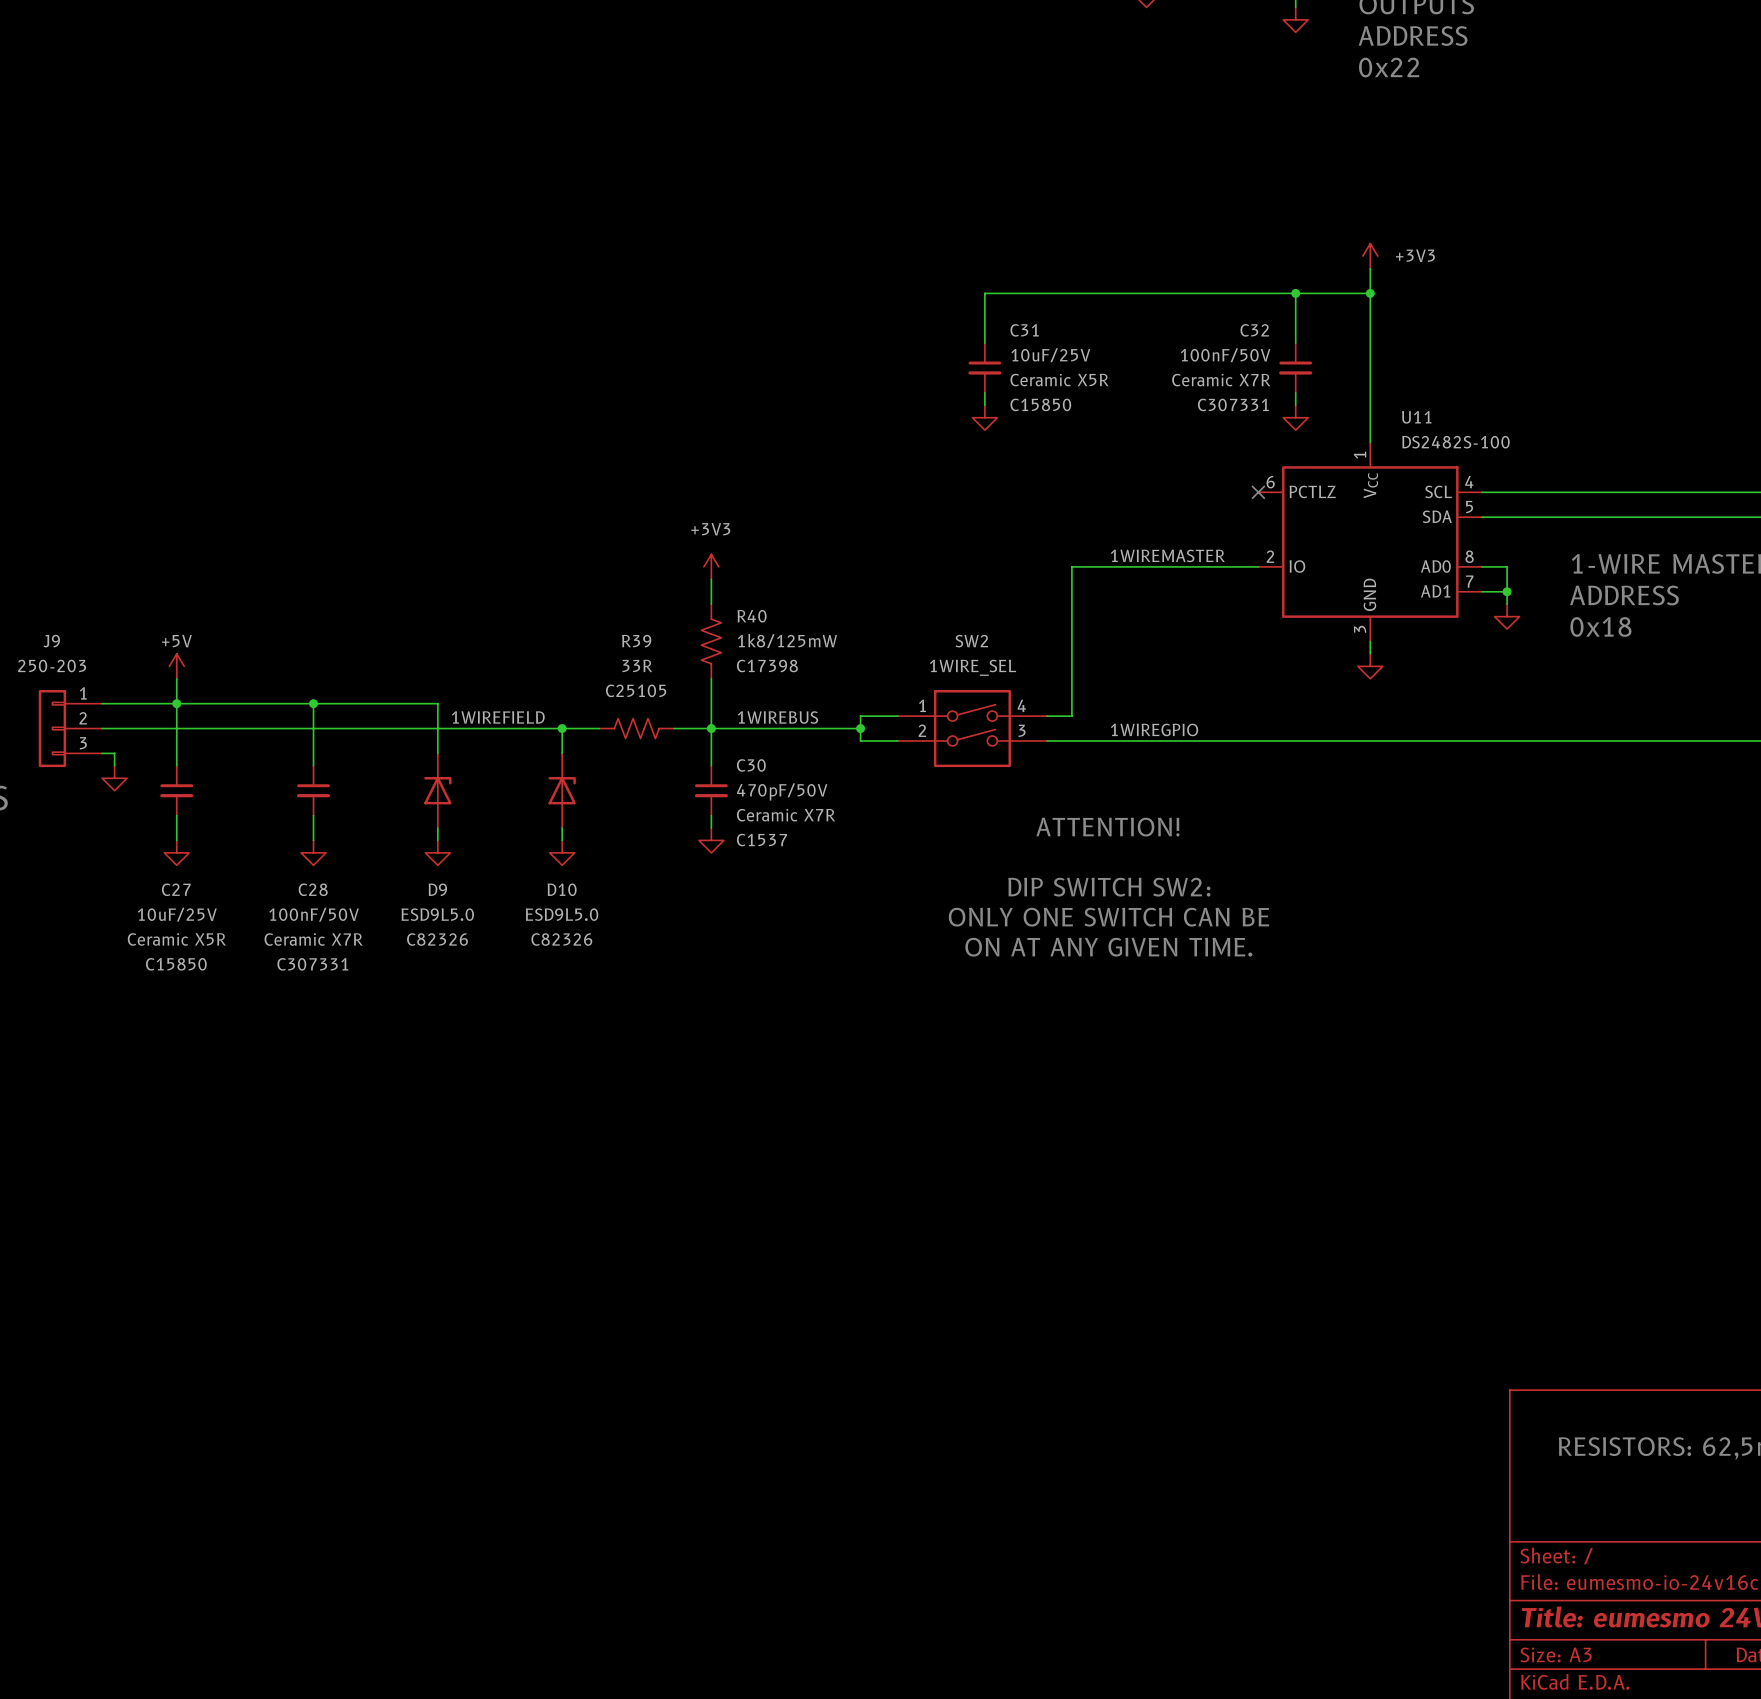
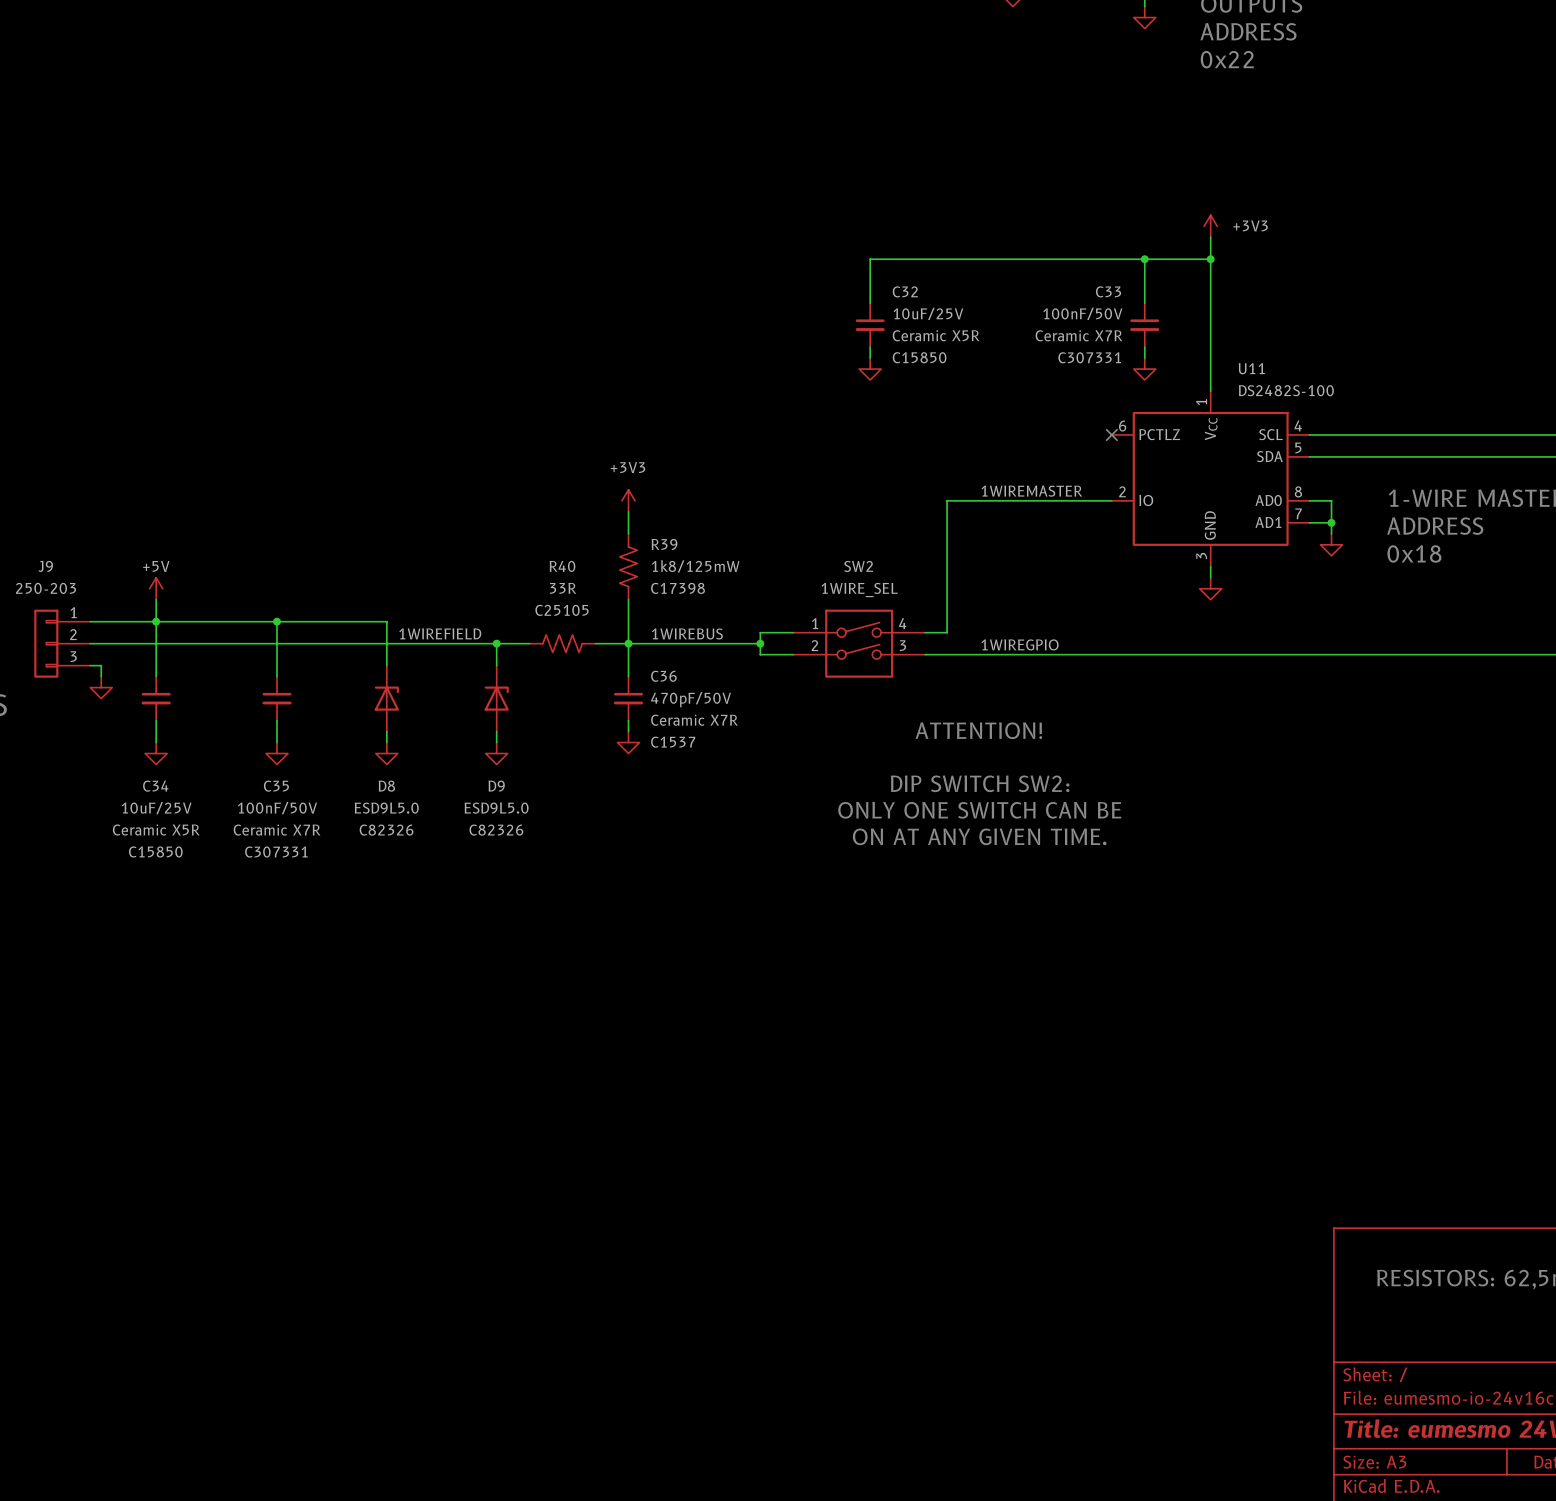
C31 name: C31 (1024, 330) -> C32 (905, 291)
C32 name: C32 (1254, 330) -> C33 (1108, 291)
R40 name: R40 (752, 616) -> R39 (664, 544)
R39 name: R39 (636, 641) -> R40 (562, 566)
C30 name: C30 (751, 765) -> C36 (663, 676)
C27 name: C27 (176, 889) -> C34 (155, 786)
C28 name: C28 (313, 889) -> C35 (276, 786)
D9 name: D9 (437, 889) -> D8 (386, 786)
D10 name: D10 (562, 889) -> D9 (496, 786)

